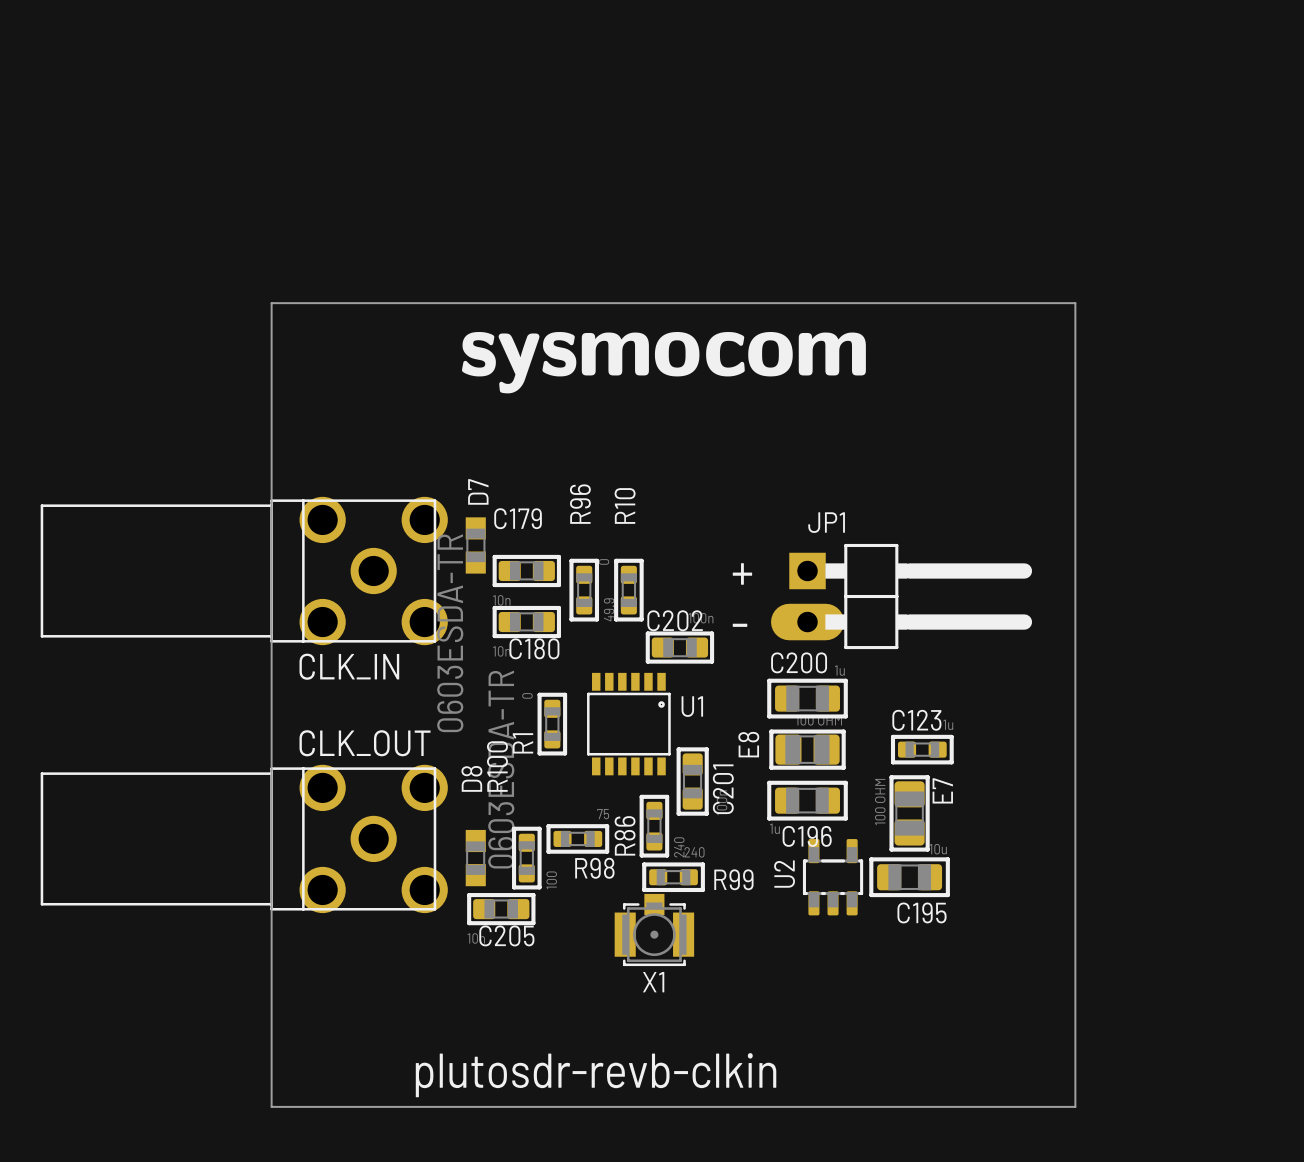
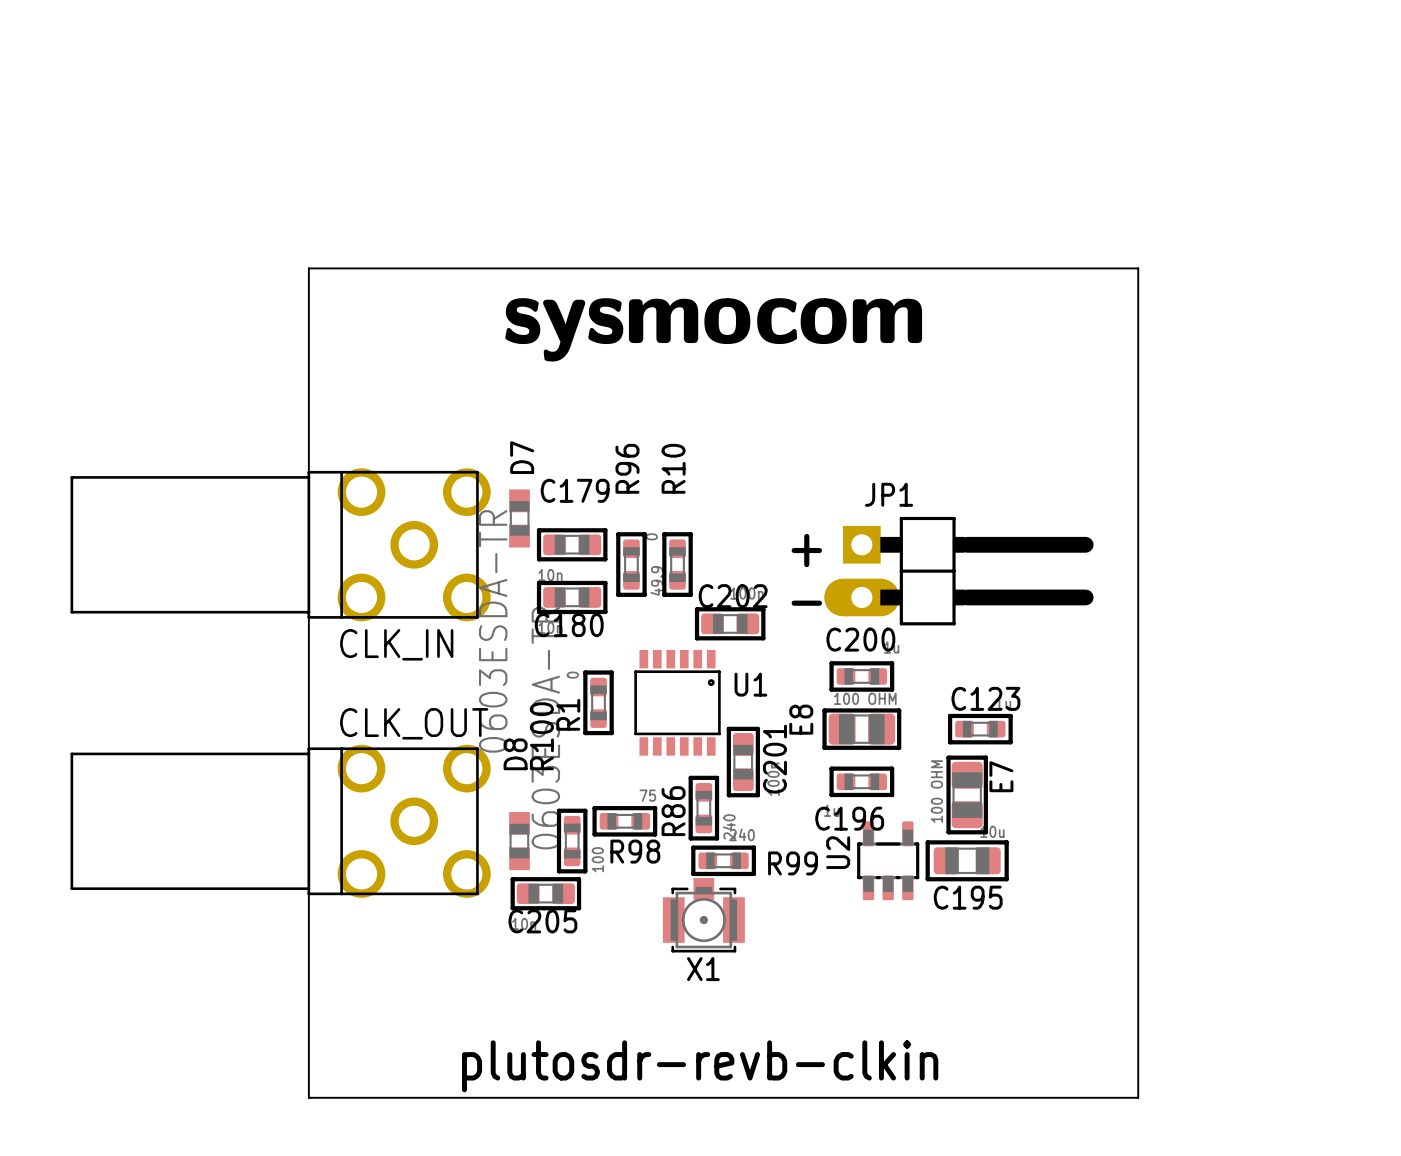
C200 footprint: [767, 678, 848, 719] -> [829, 661, 895, 692]
C196 footprint: [767, 780, 848, 821] -> [829, 766, 895, 798]

